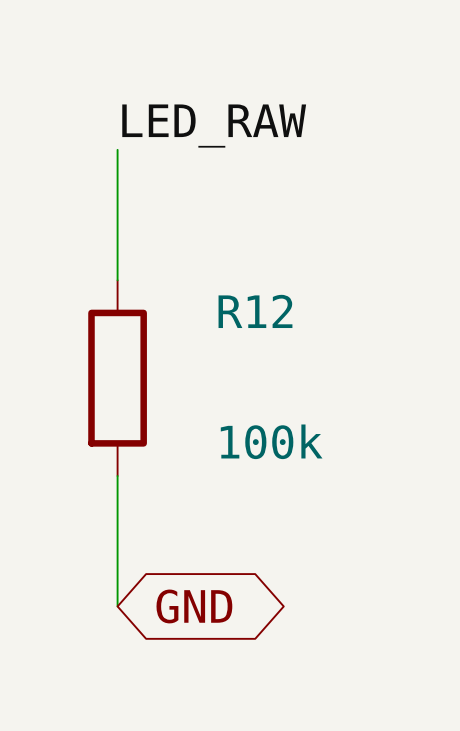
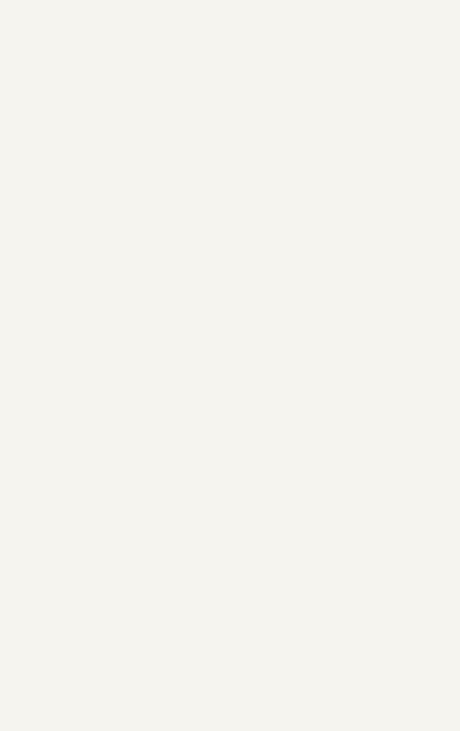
label: LED_RAW (214, 126) -> none
wire: (117, 149) (117, 280) -> none
R12: 100k (117, 378) -> none
wire: (117, 476) (117, 606) -> none
global label: GND (194, 606) -> none

